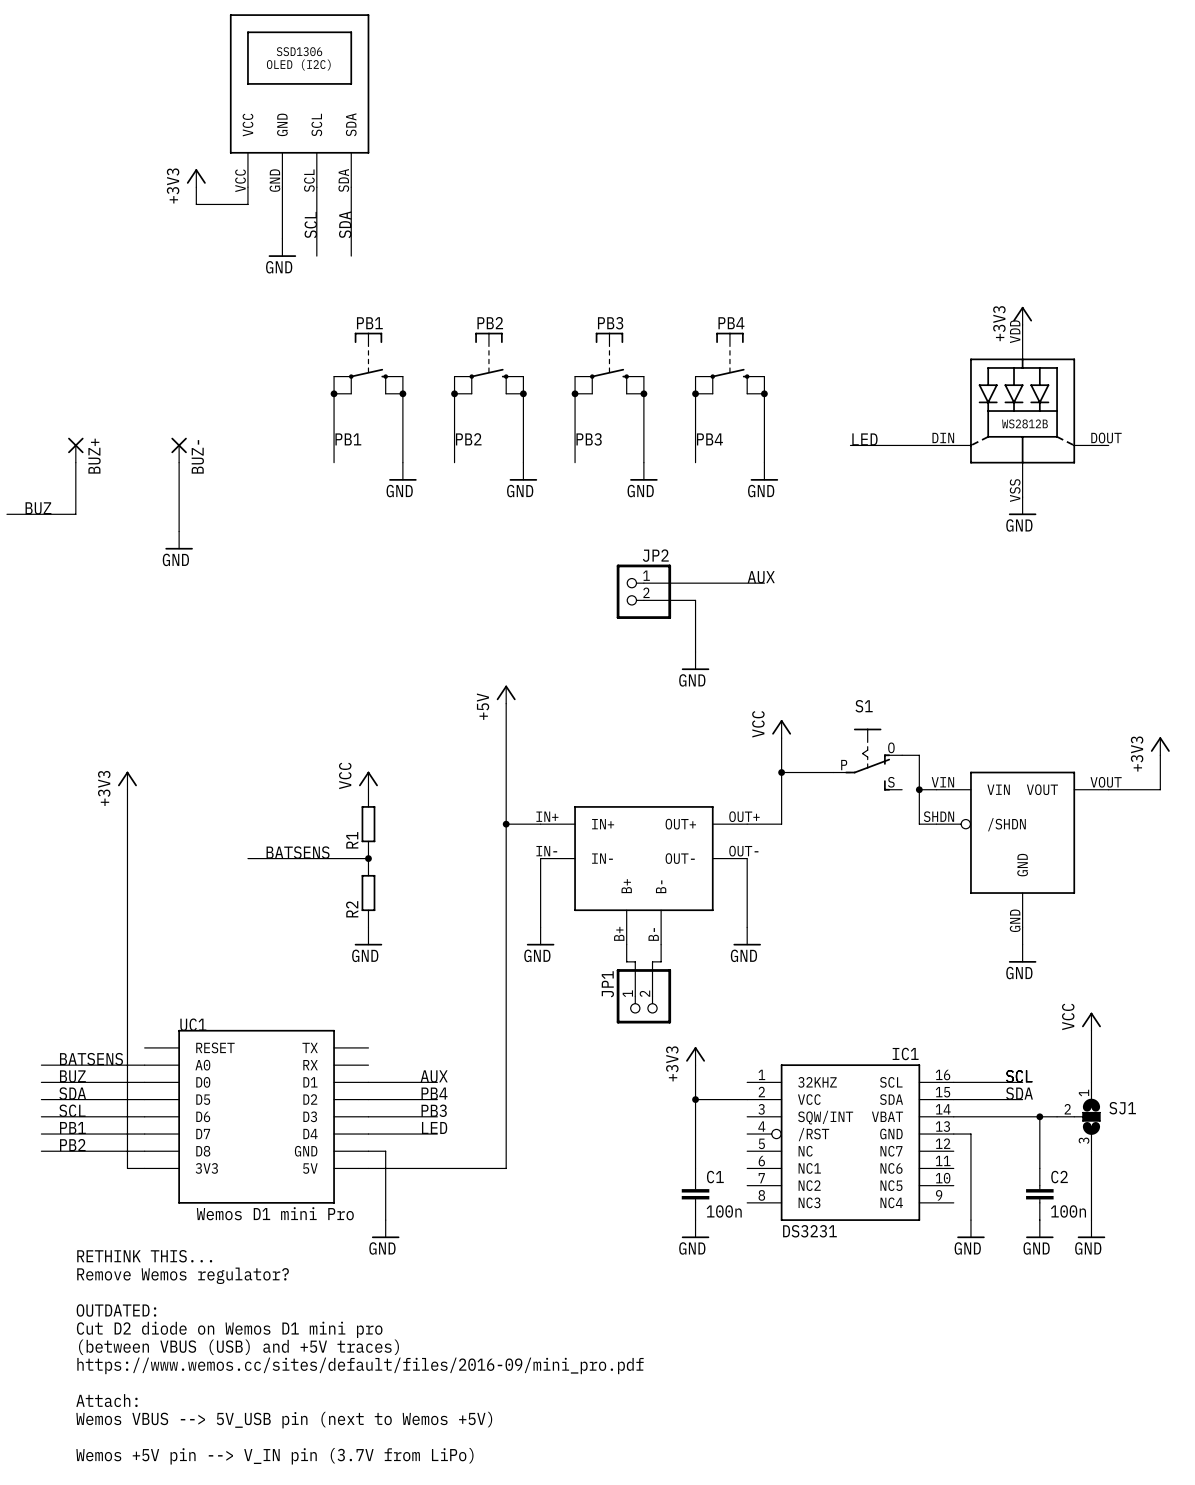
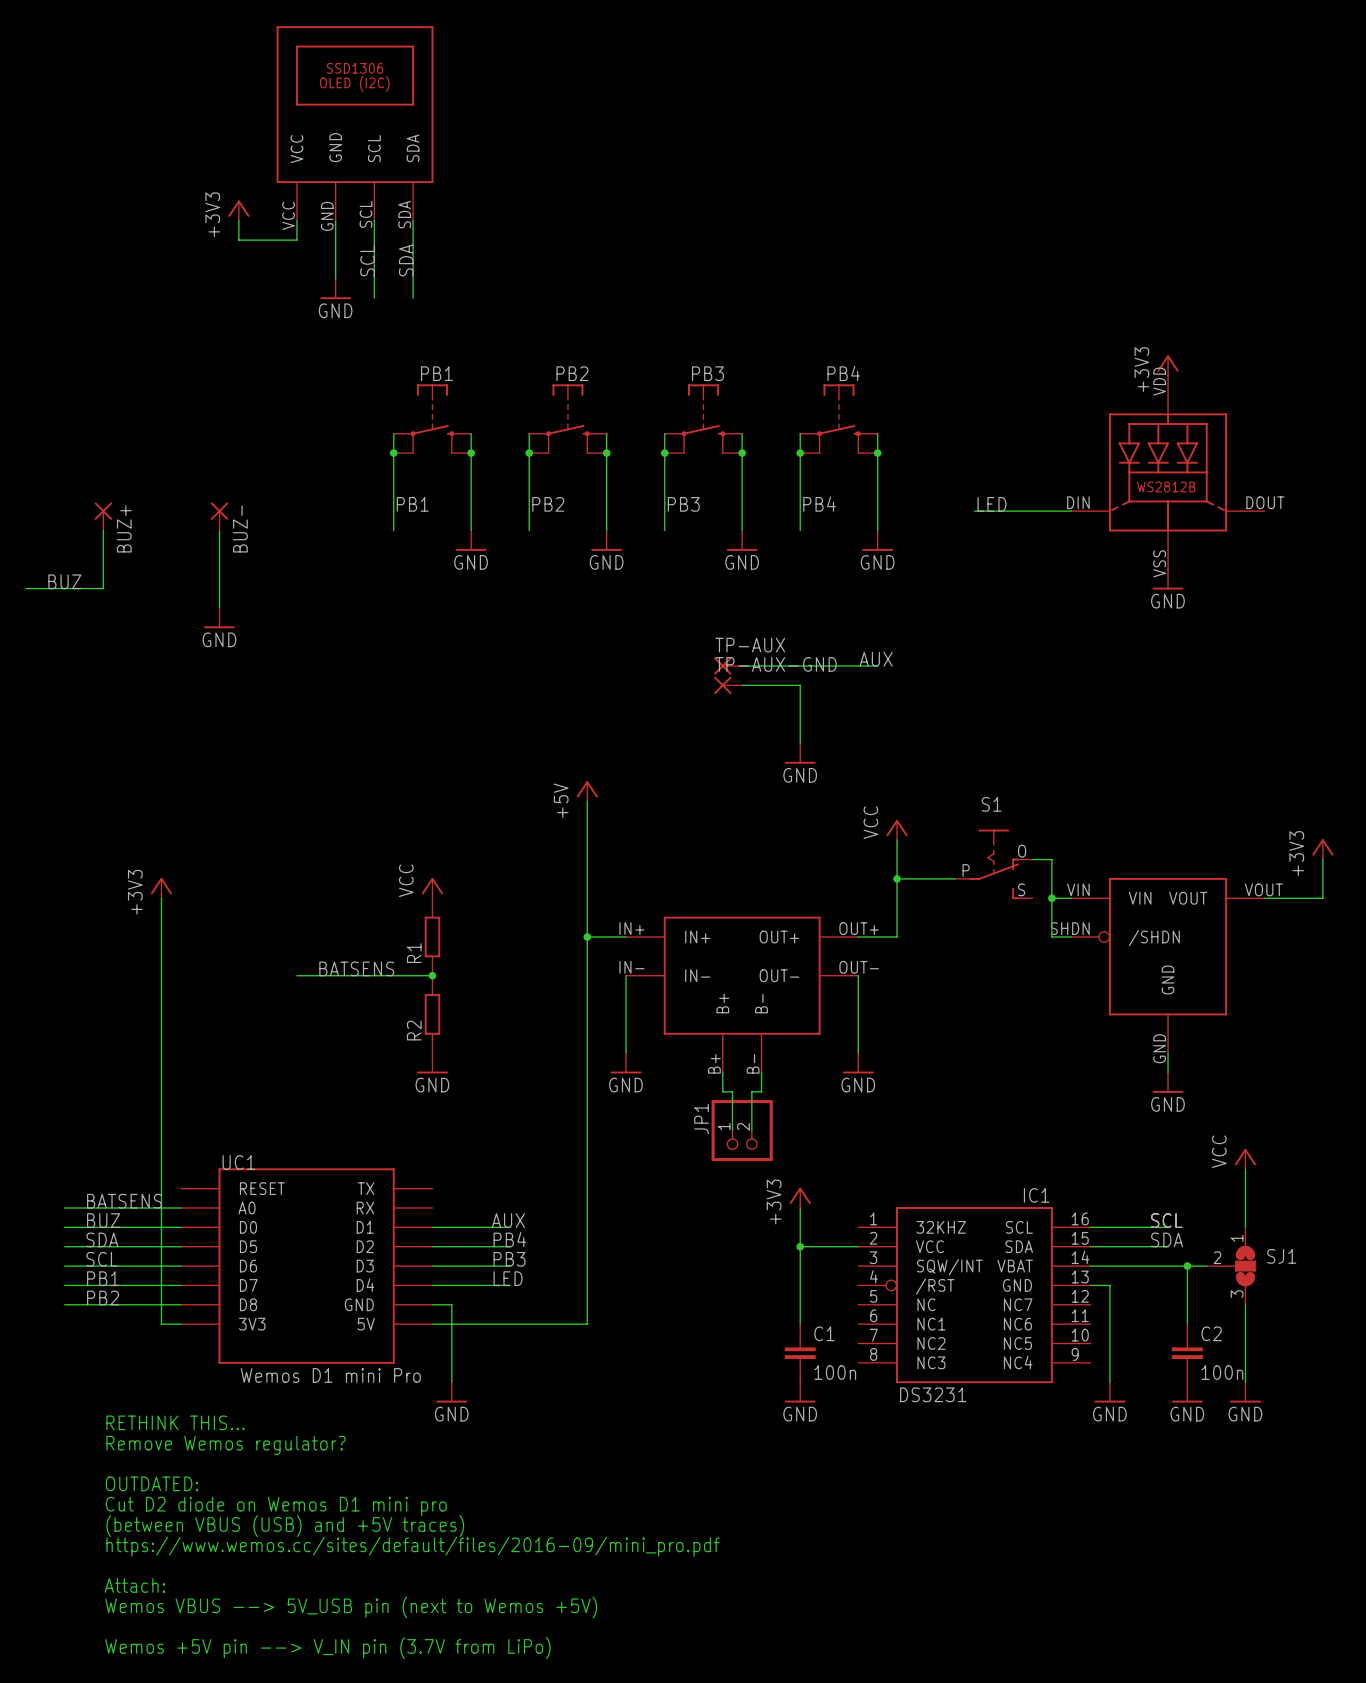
TP-AUX: none -> (728, 665)
JP2: (643, 591) -> none
TP-AUX-GND: none -> (728, 685)

